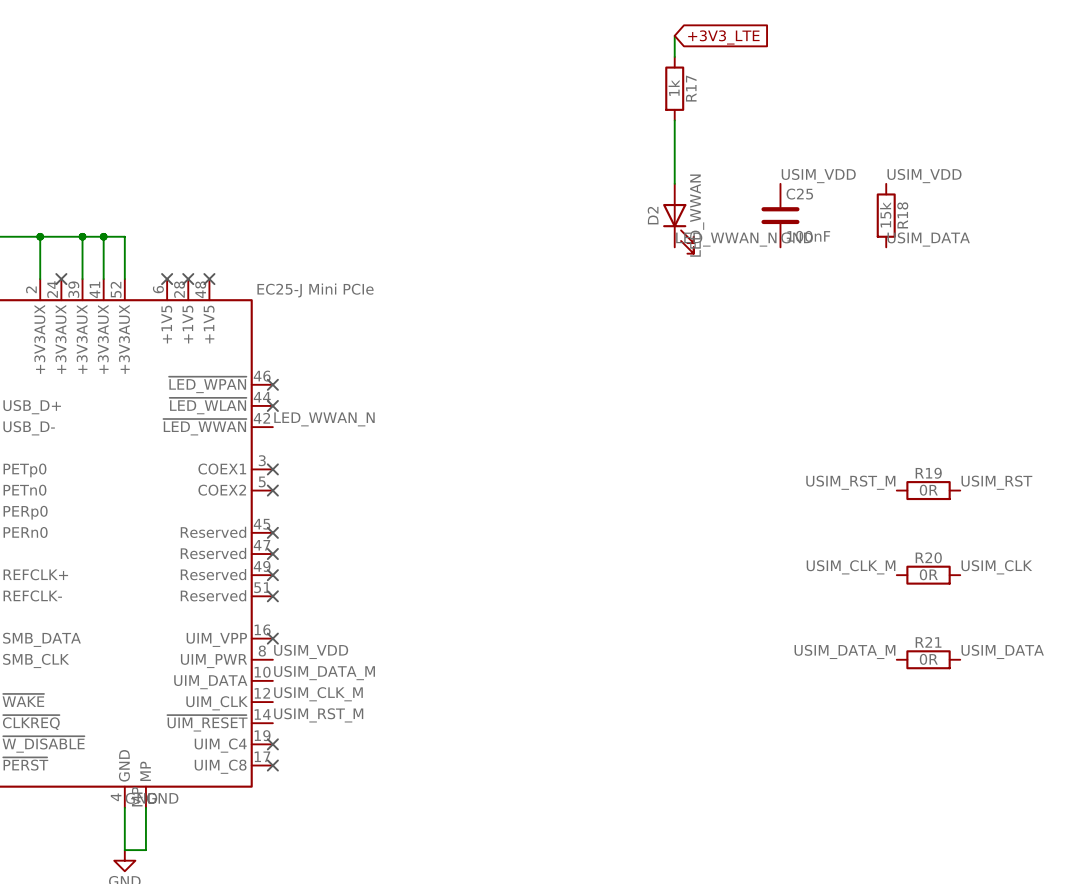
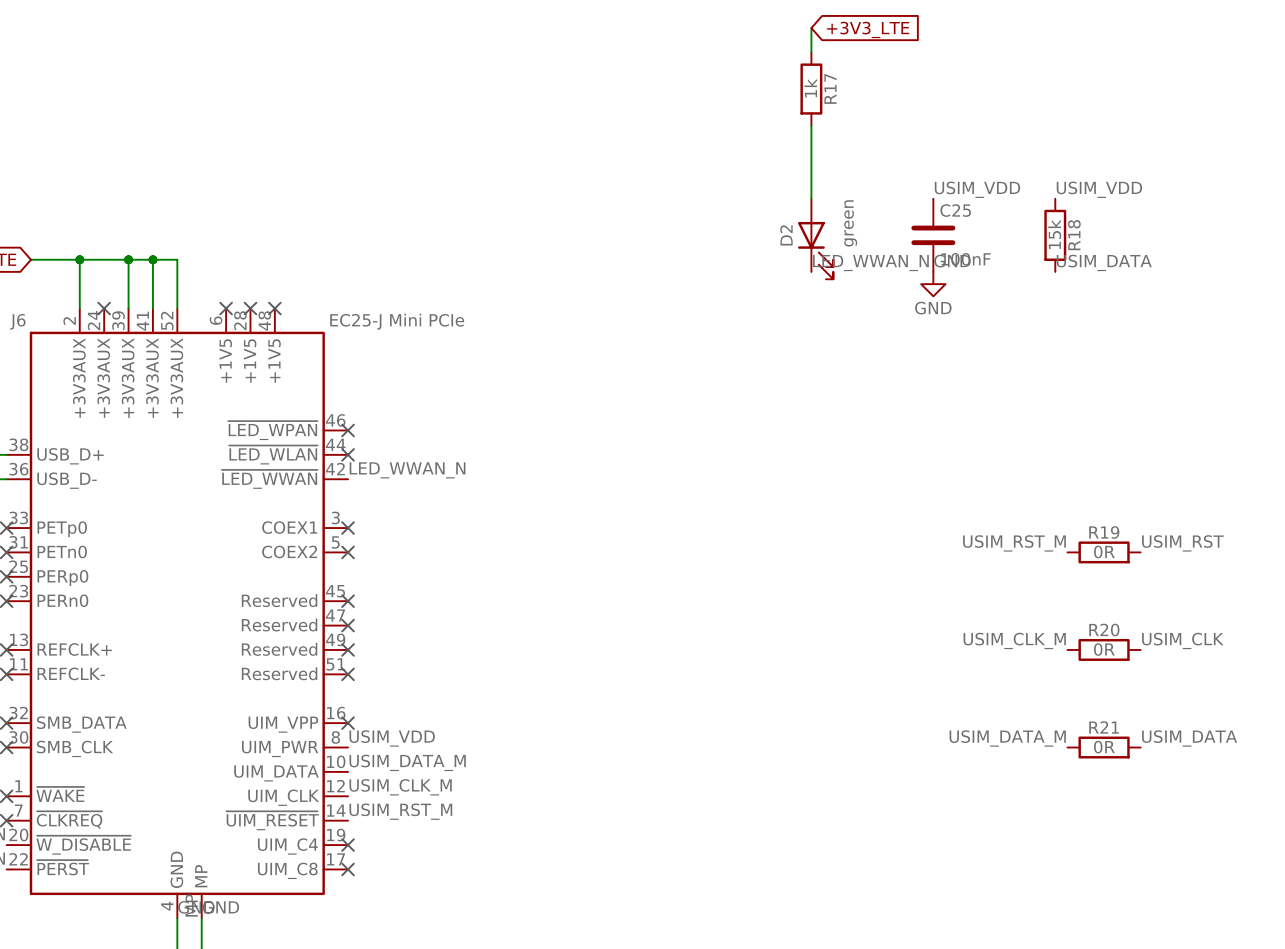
D2 value: LED_WWAN (697, 215) -> green (850, 223)
power symbol: none -> GND (933, 284)

